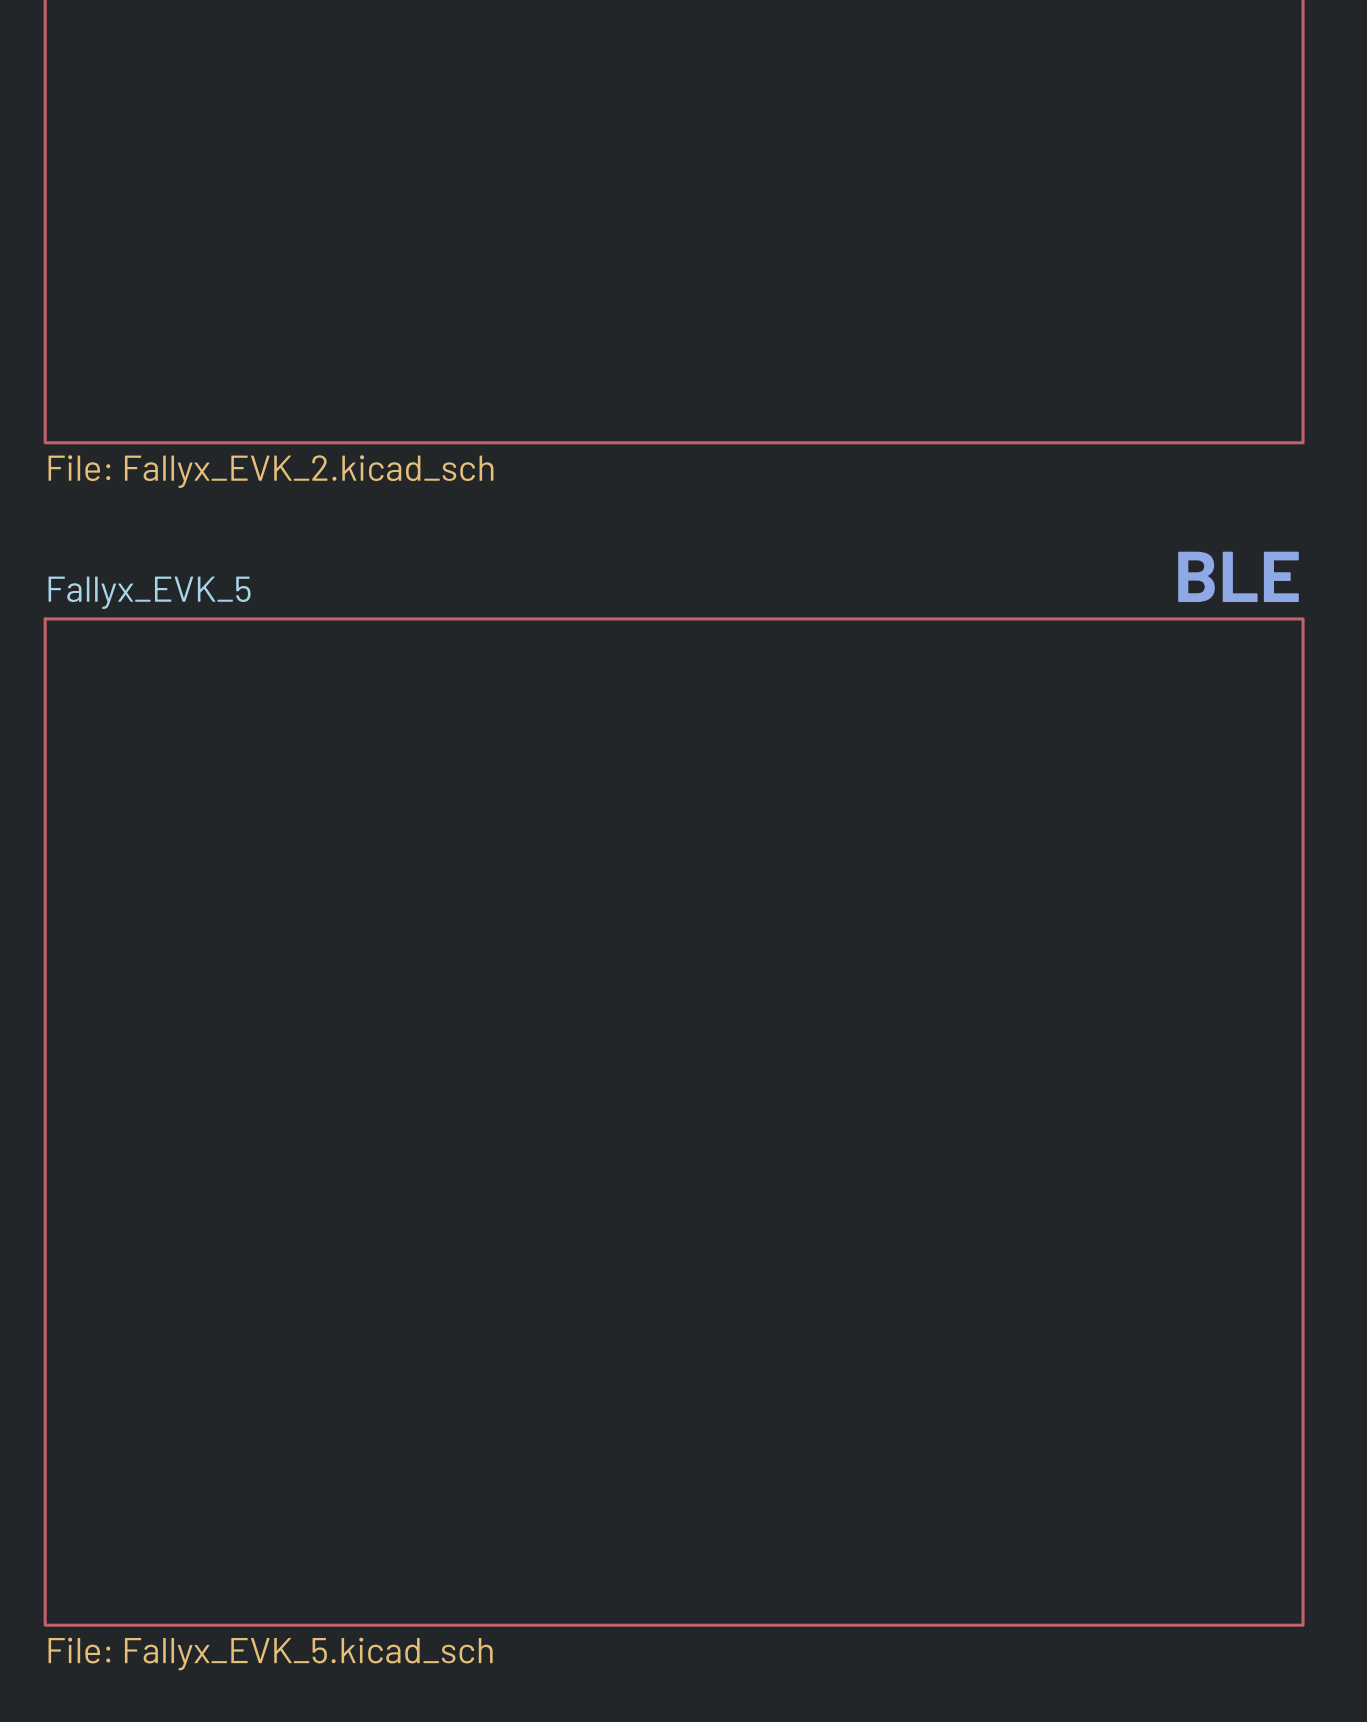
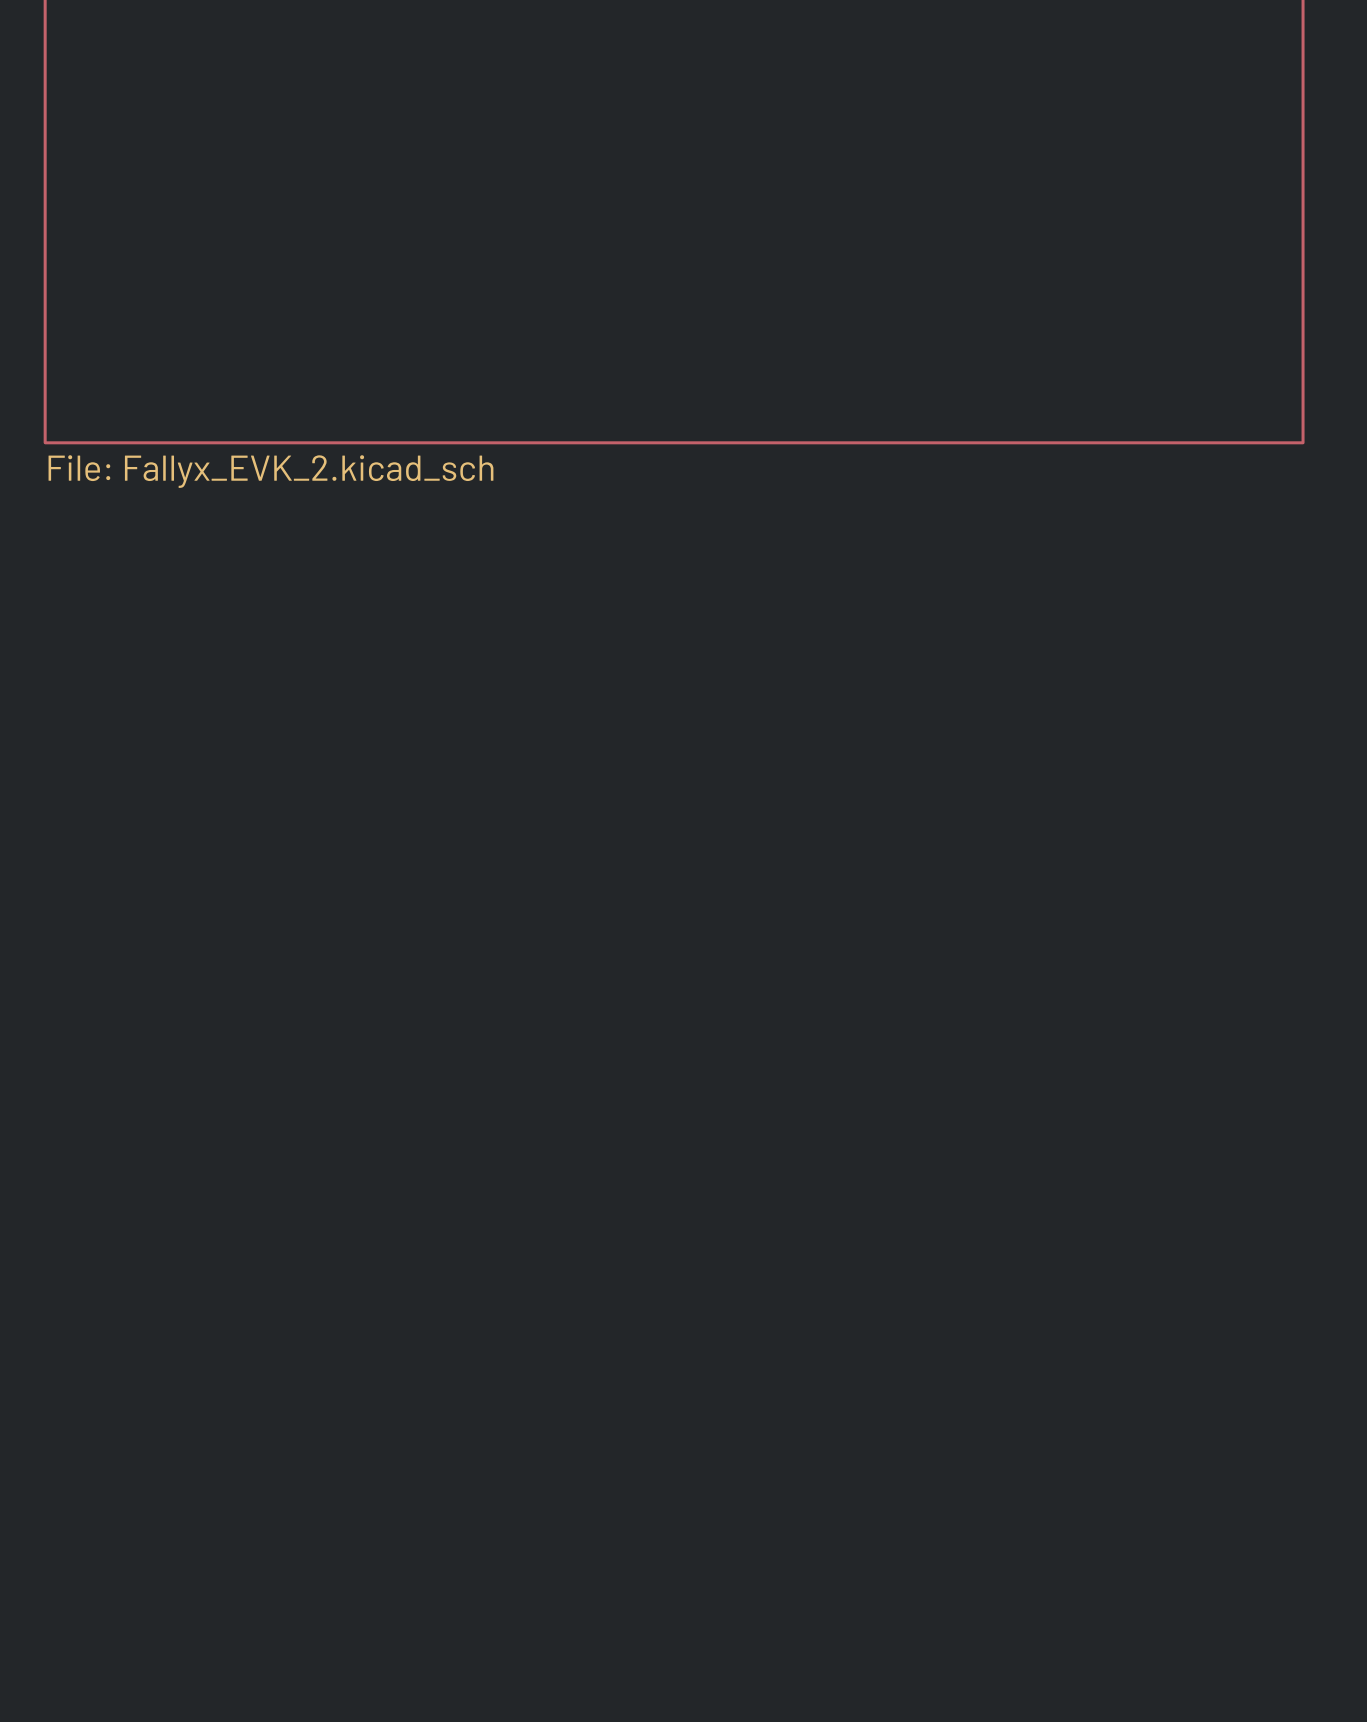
text: BLE (1238, 576) -> none
sheet Fallyx_EVK_5: File: Fallyx_EVK_5.kicad_sch (674, 1122) -> none

